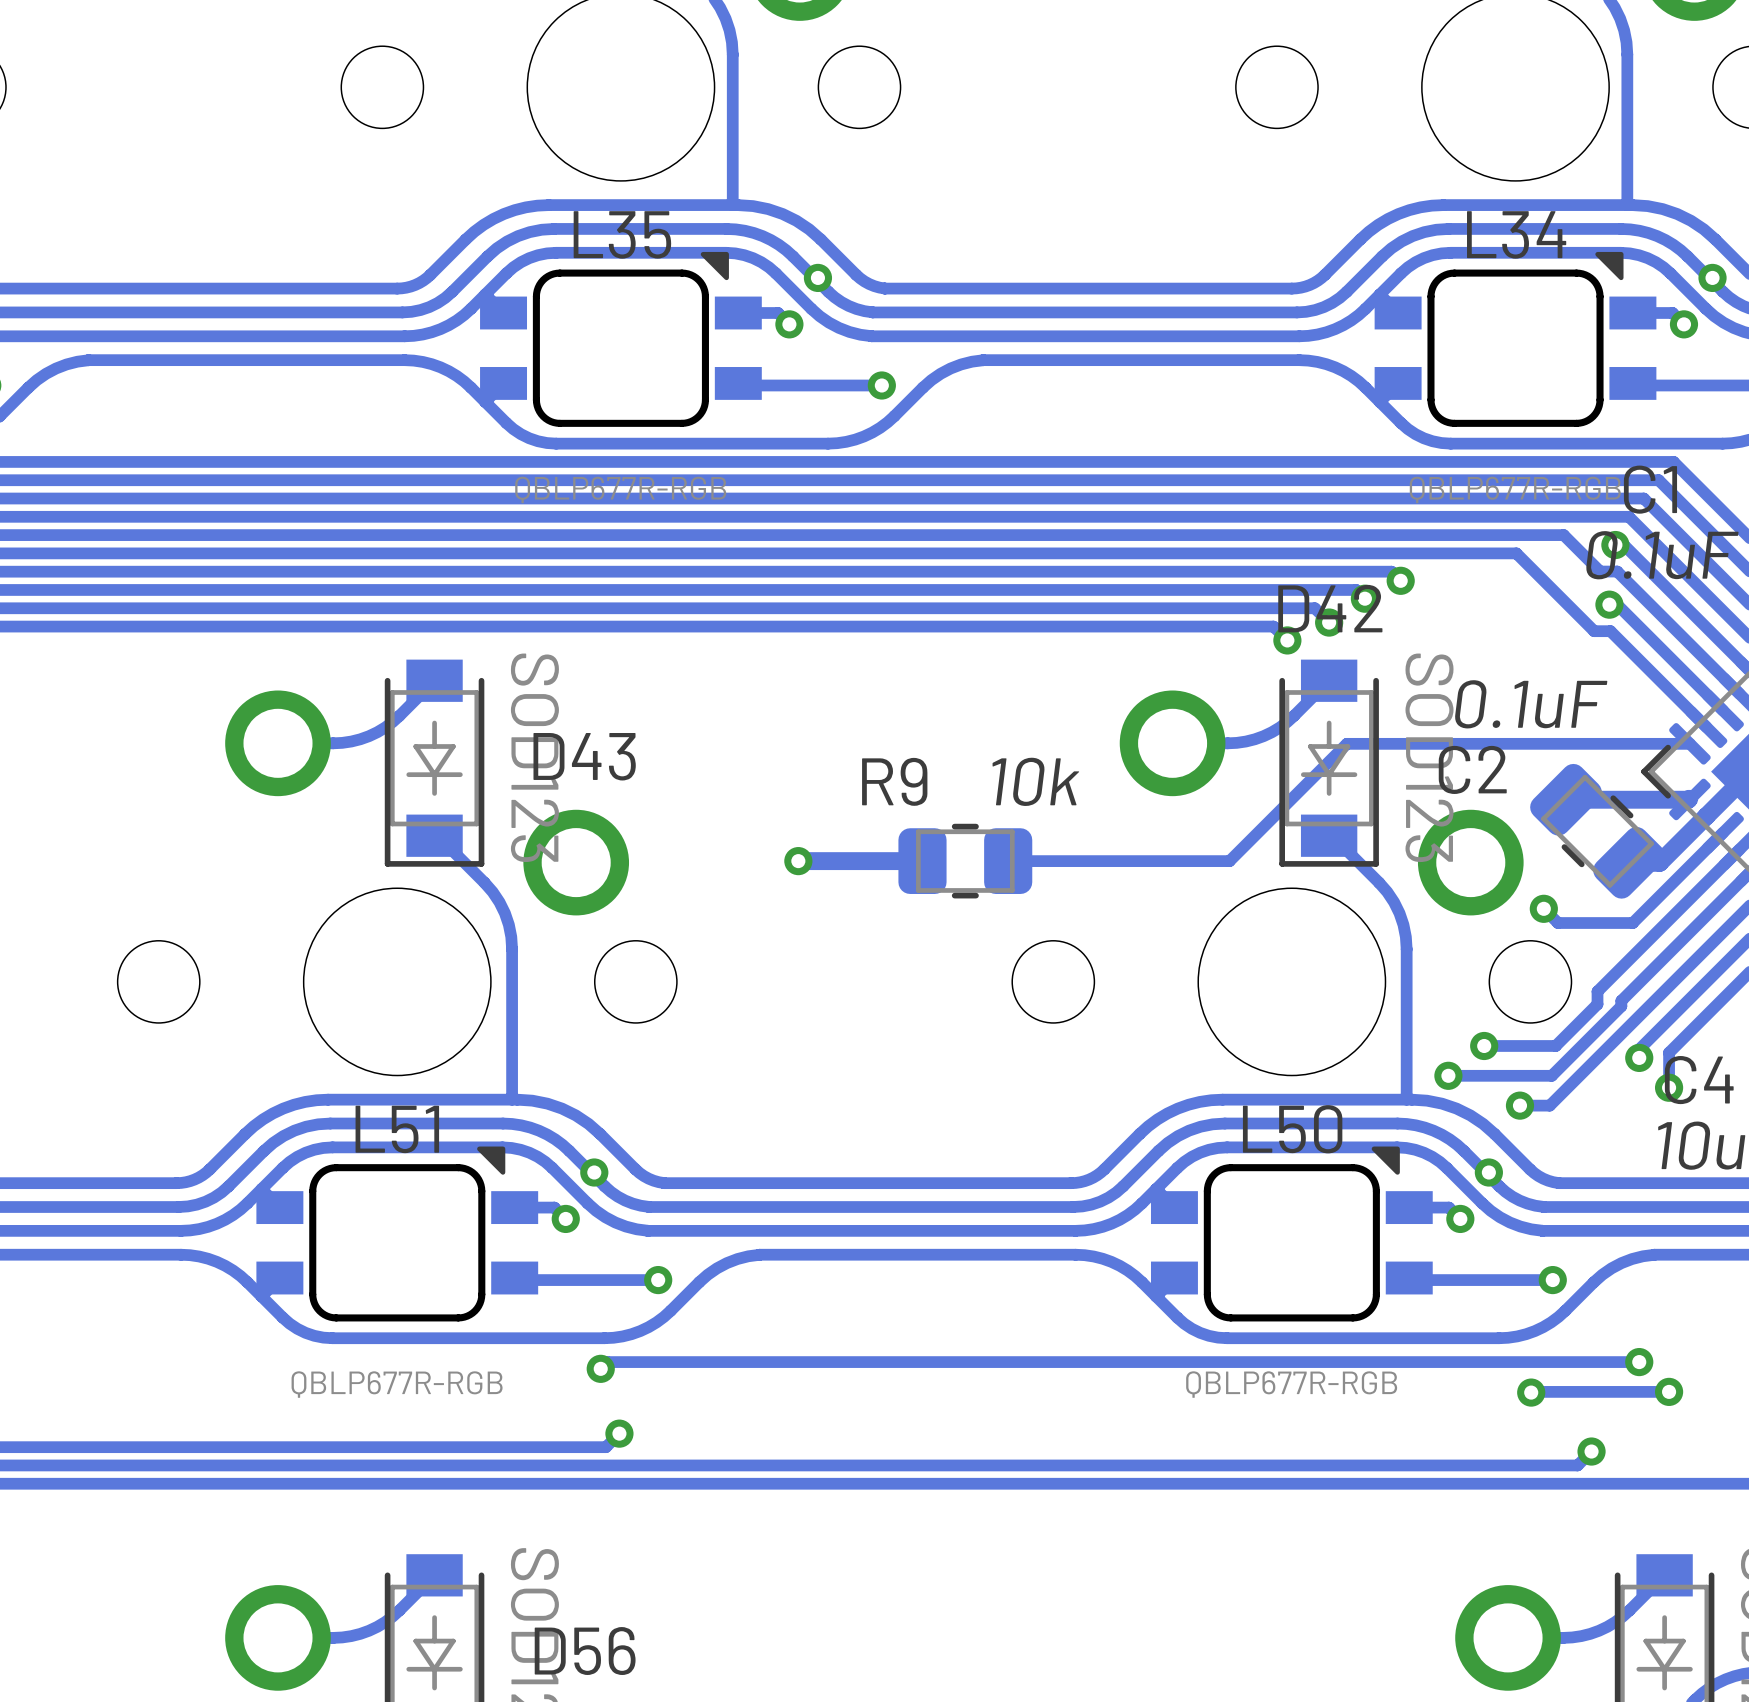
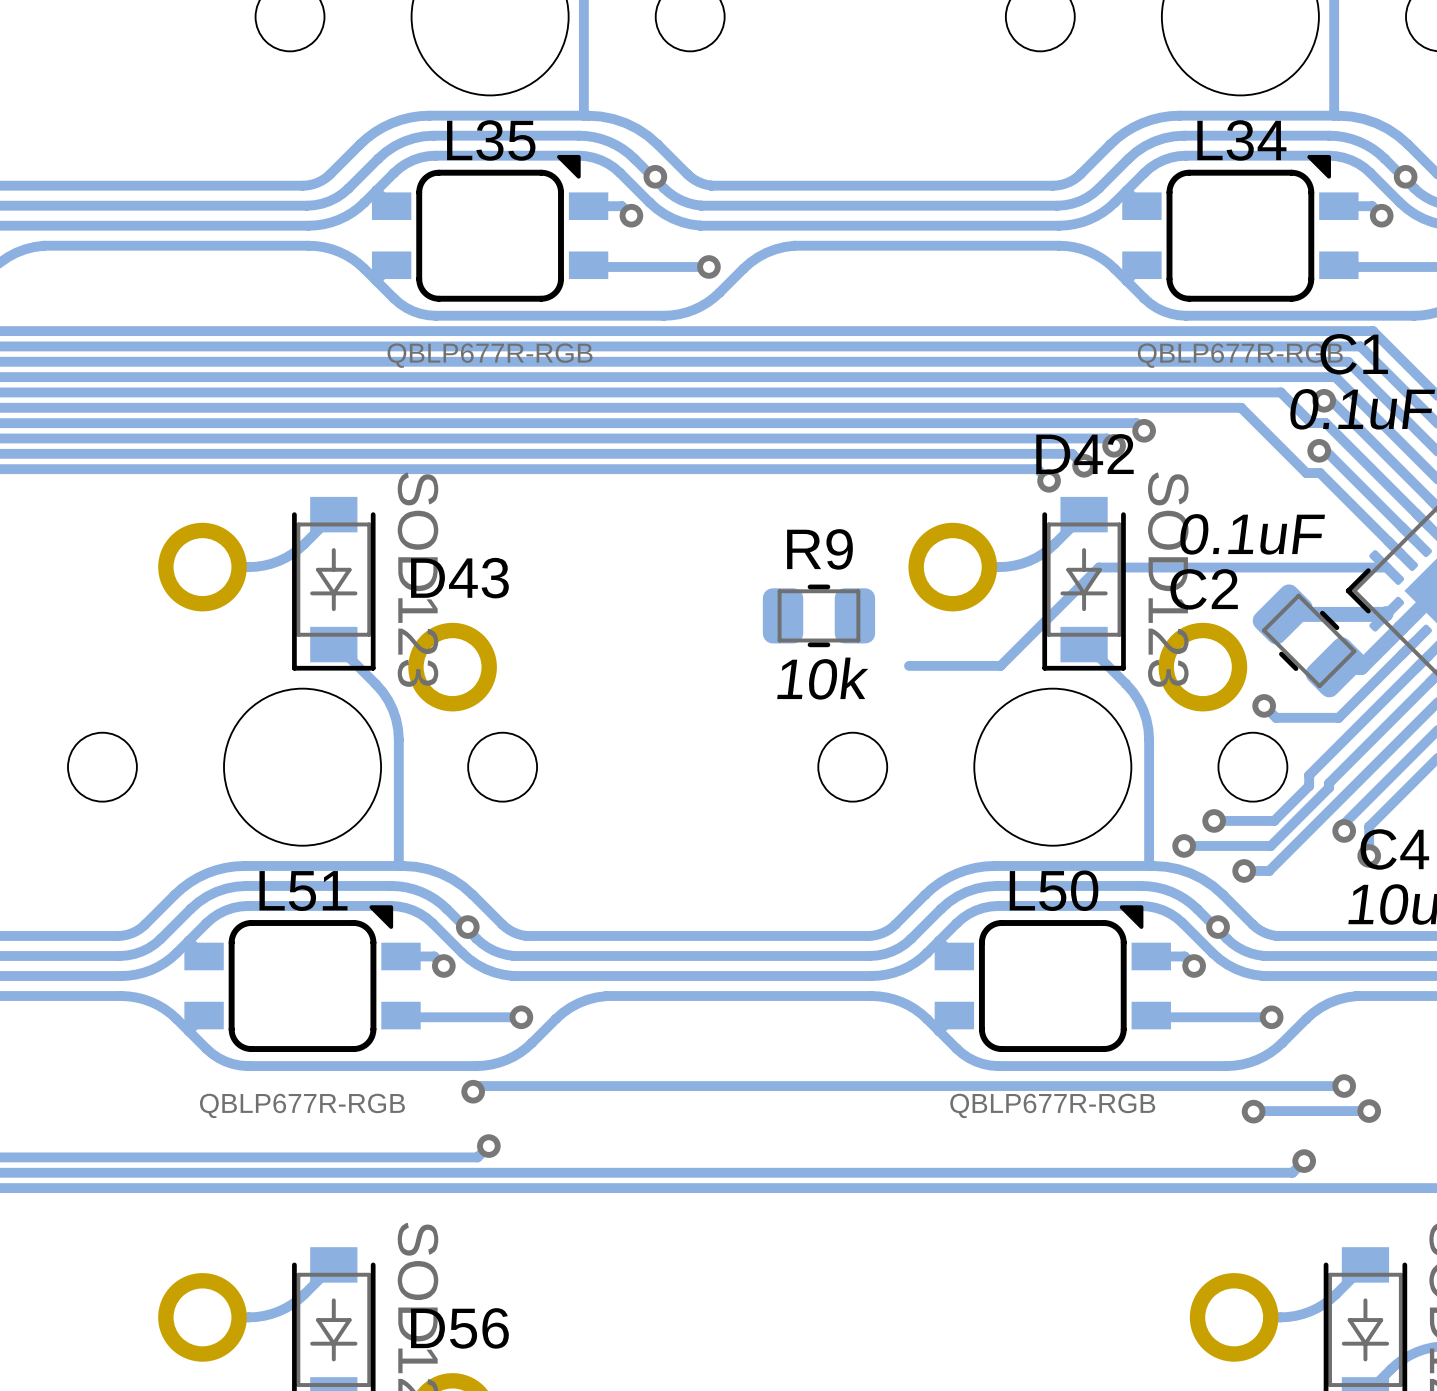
R9 name position: R9 (894, 781) -> R9 (819, 549)
R9 value position: 10k (1035, 781) -> 10k (822, 678)
via: (798, 861) -> none
track: (922, 861) (798, 861) -> none
R9 position: (965, 861) -> (818, 615)
track: (1120, 861) (1008, 861) -> none

